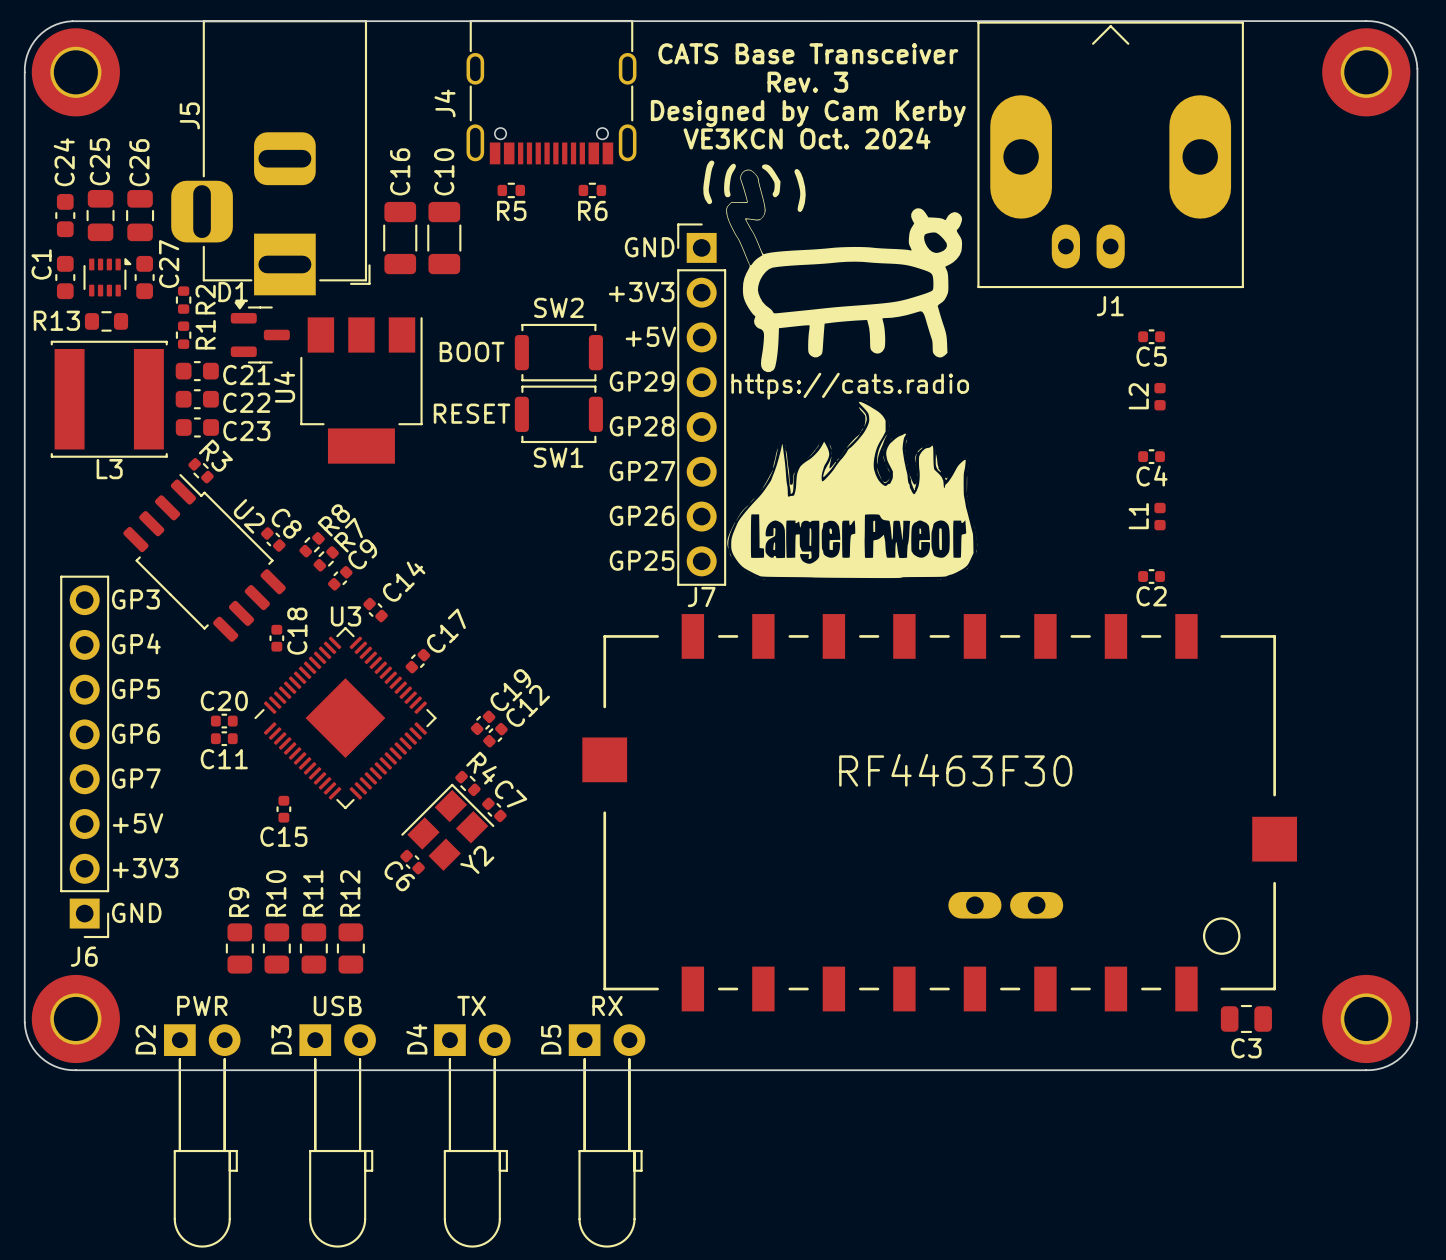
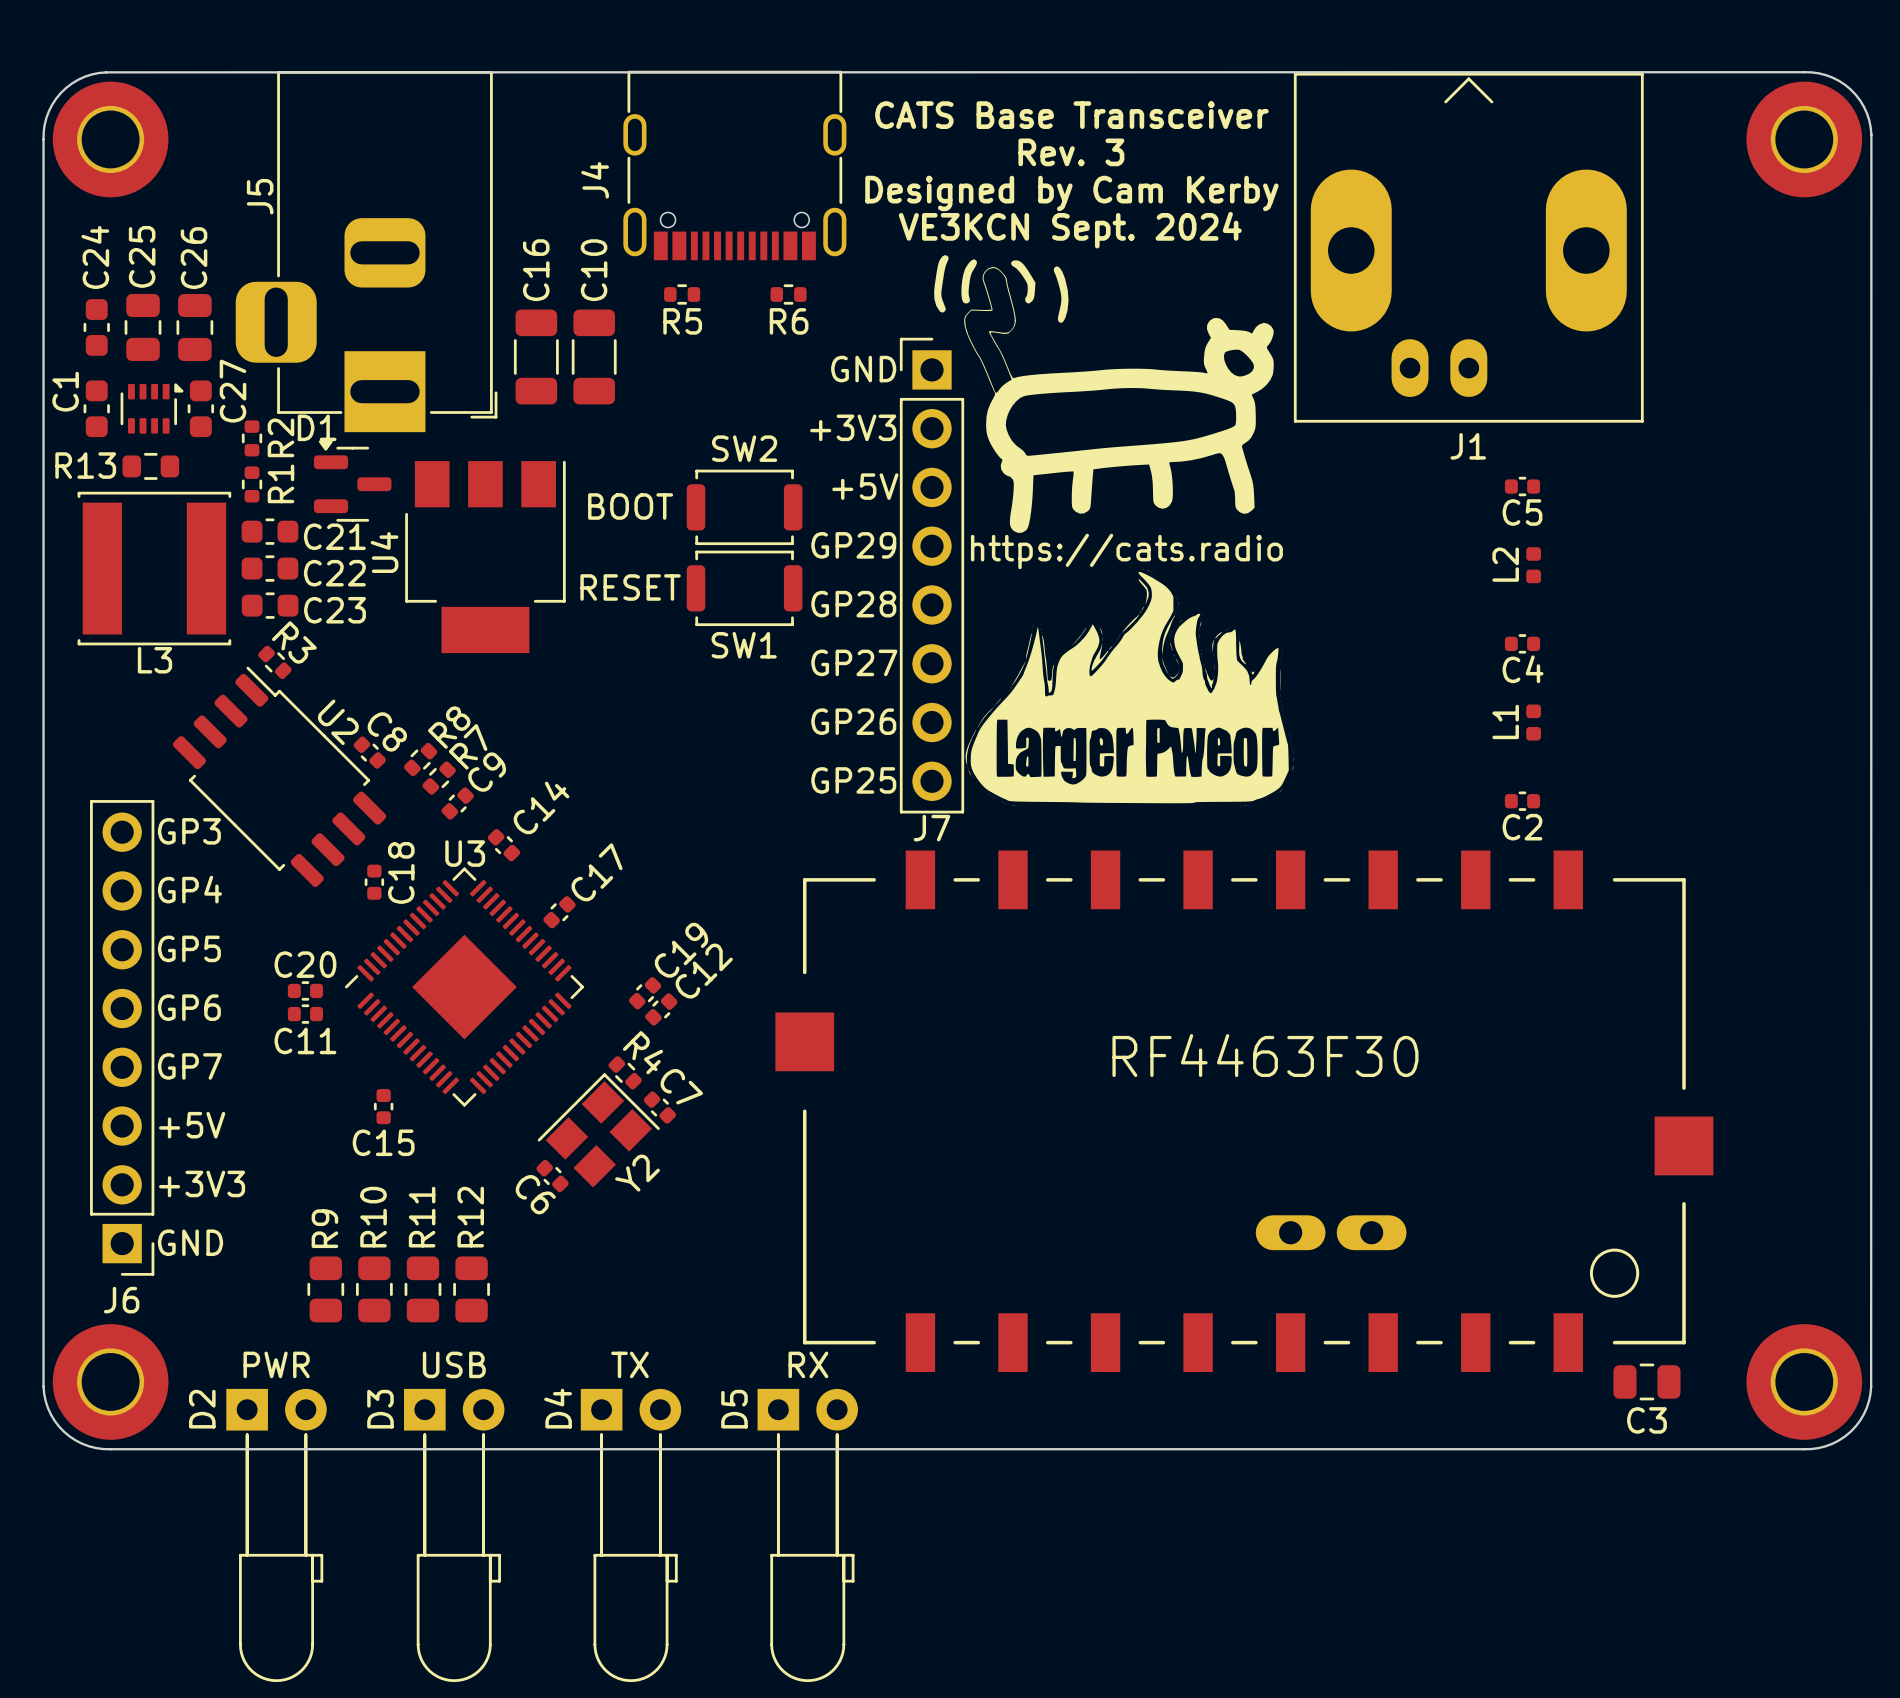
text: VE3KCN Oct. 2024 (807, 138) -> VE3KCN Sept. 2024 (1070, 230)

